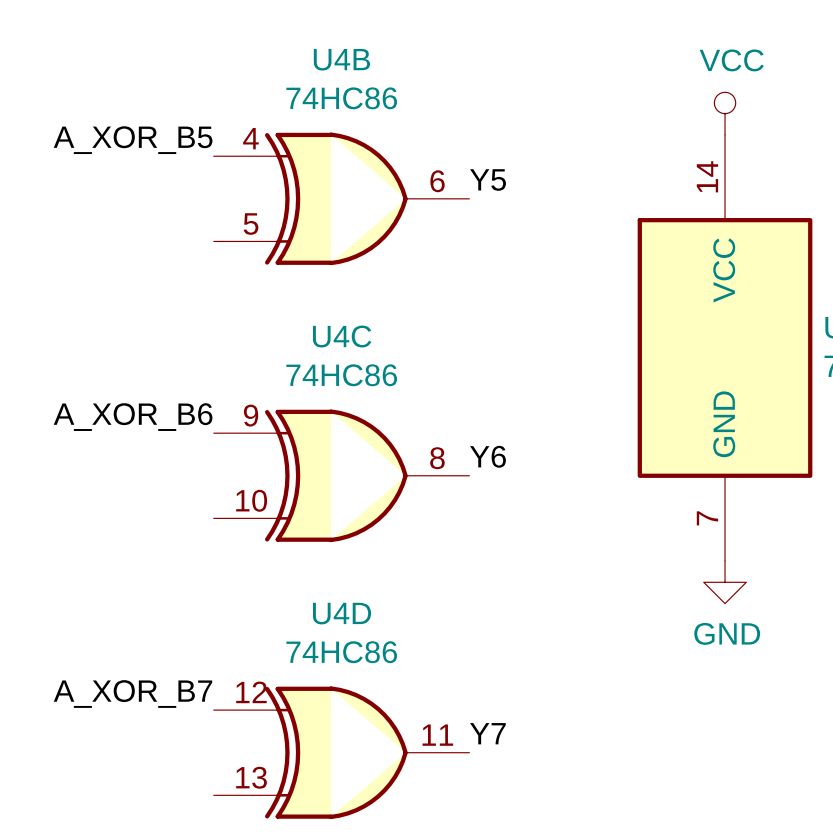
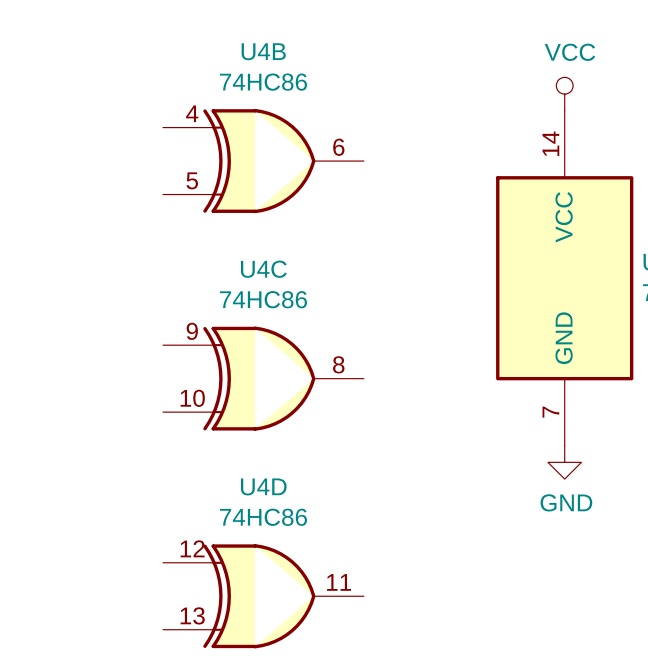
label: A_XOR_B5 (133, 140) -> none
label: Y5 (488, 179) -> none
label: A_XOR_B6 (133, 417) -> none
label: Y6 (487, 456) -> none
label: A_XOR_B7 (132, 694) -> none
label: Y7 (487, 733) -> none

